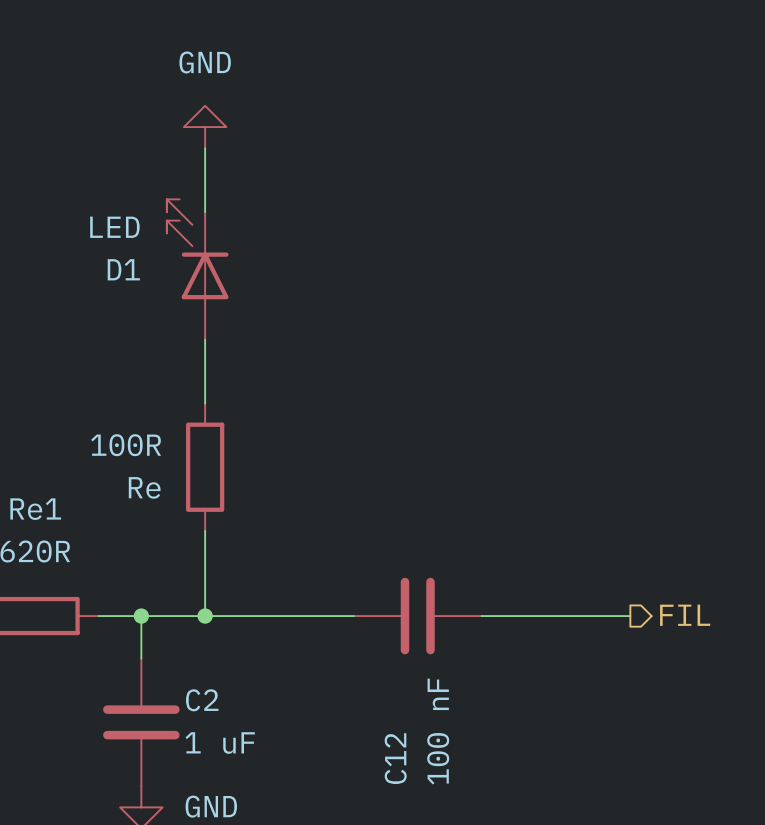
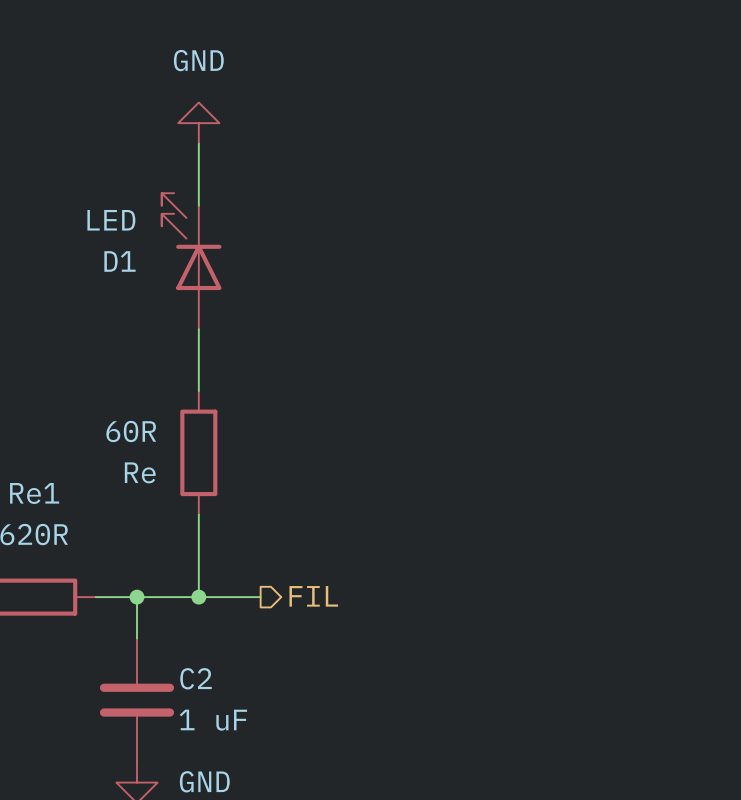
Re value: 100R (126, 445) -> 60R (131, 431)
hierarchical label position: FIL (685, 615) -> FIL (313, 596)
wire: (268, 616) (353, 616) -> none
C12: 100 nF (417, 616) -> none
wire: (481, 616) (630, 616) -> none

